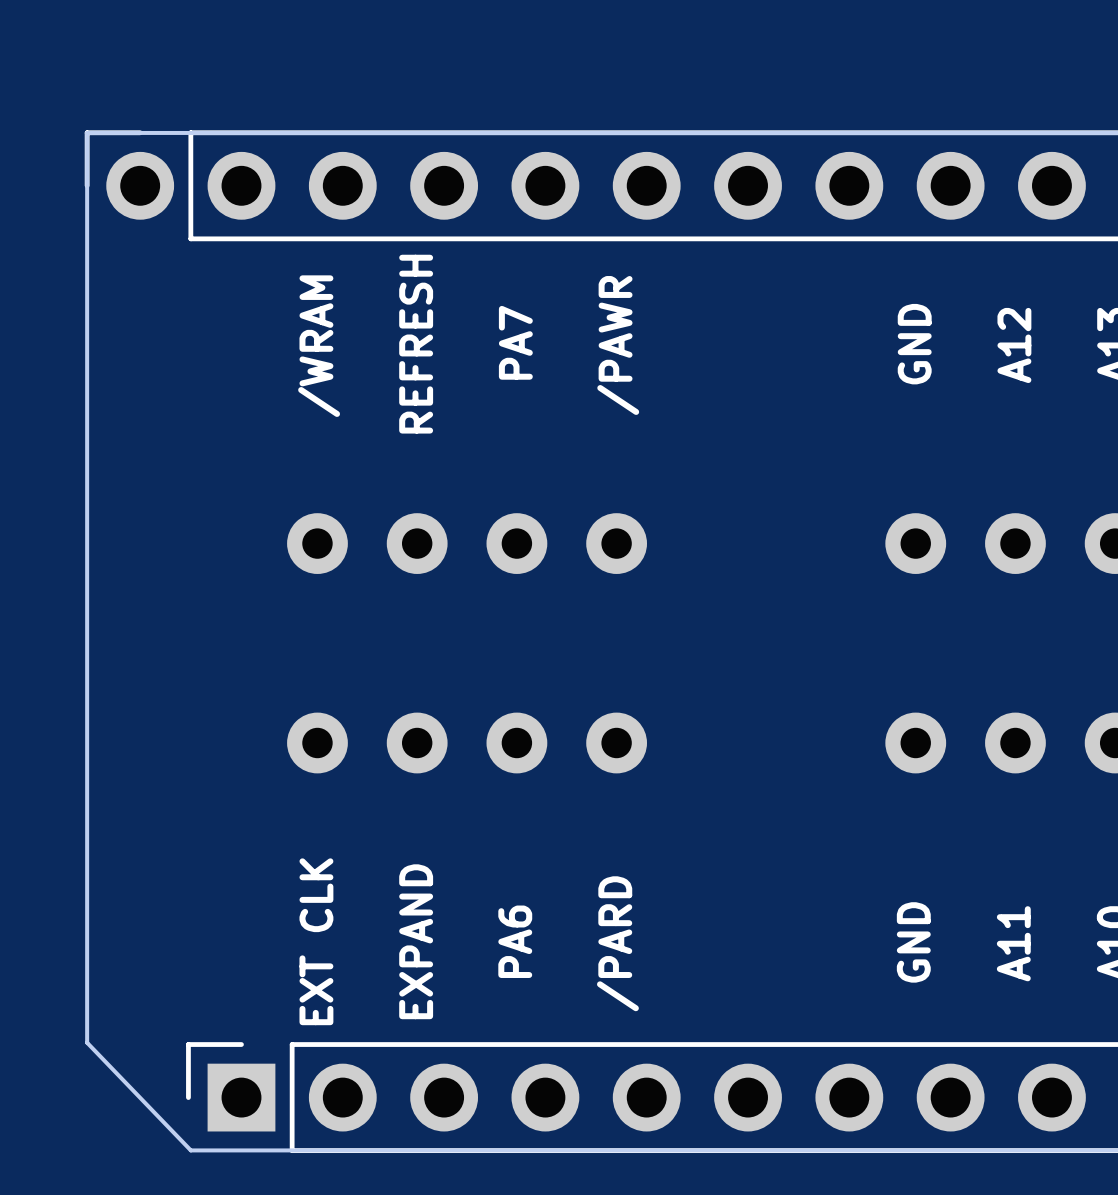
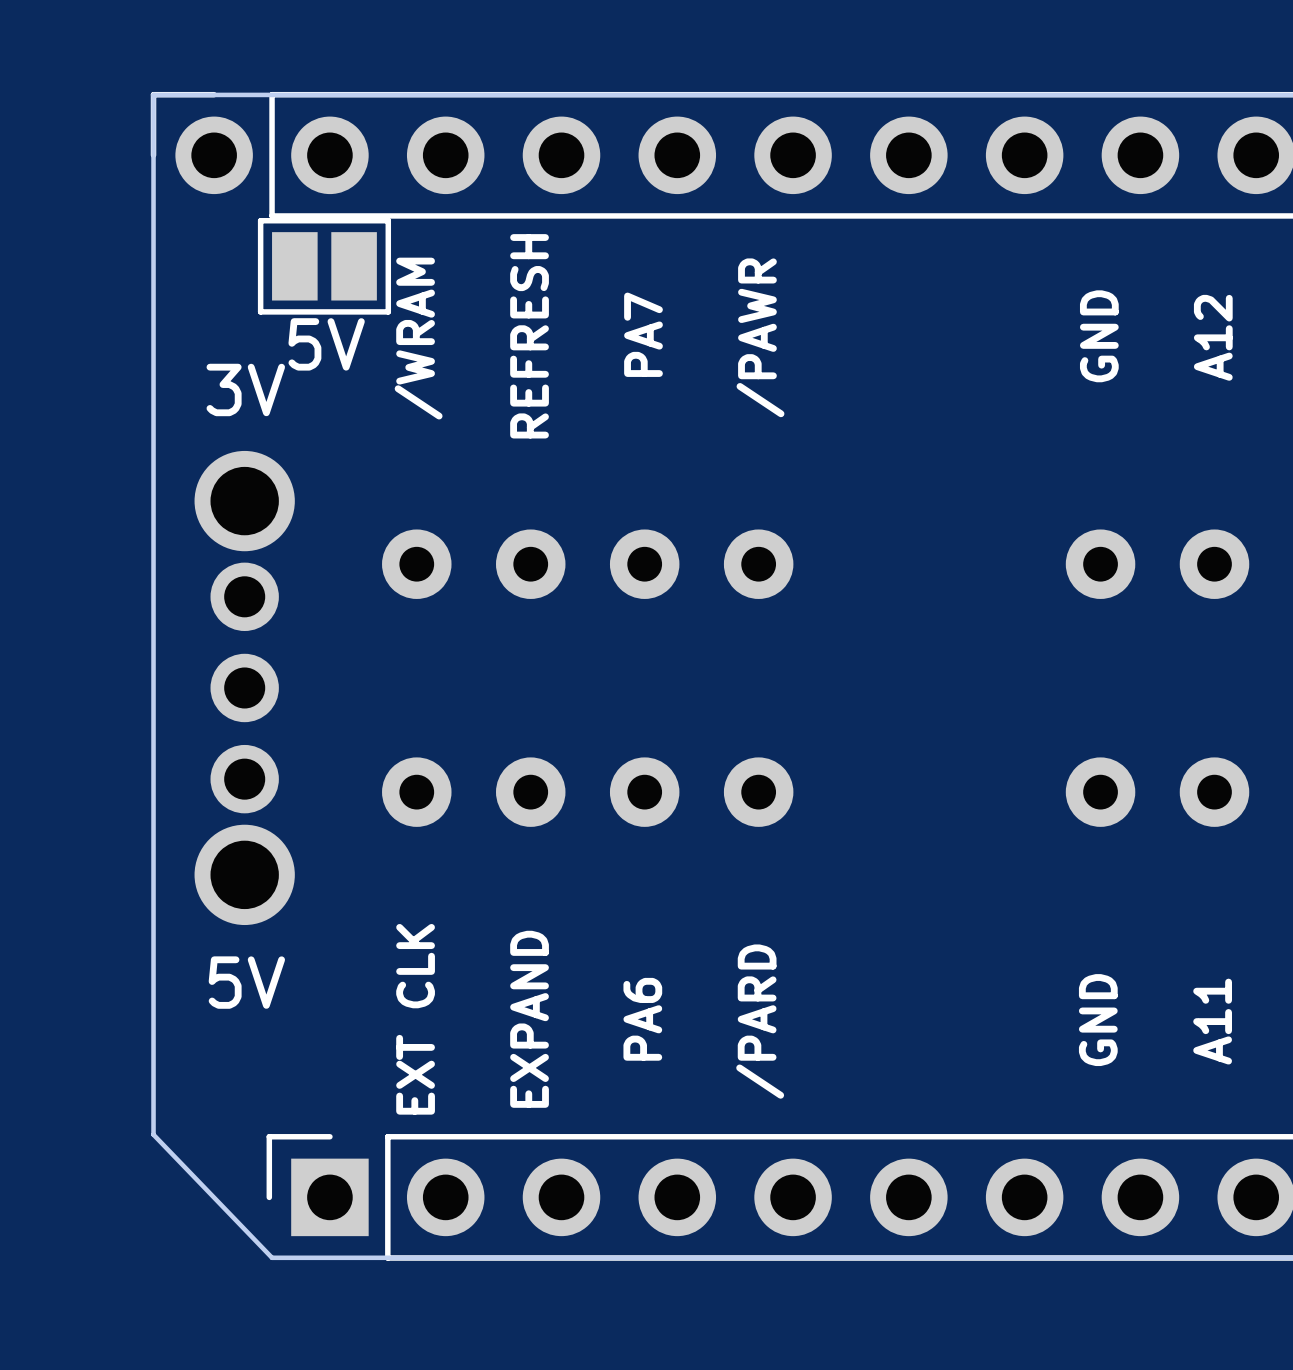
part: none -> (324, 266)
text: none -> 5V (326, 344)
text: none -> 3V (245, 389)
part: none -> (244, 687)
text: none -> 5V (246, 982)

